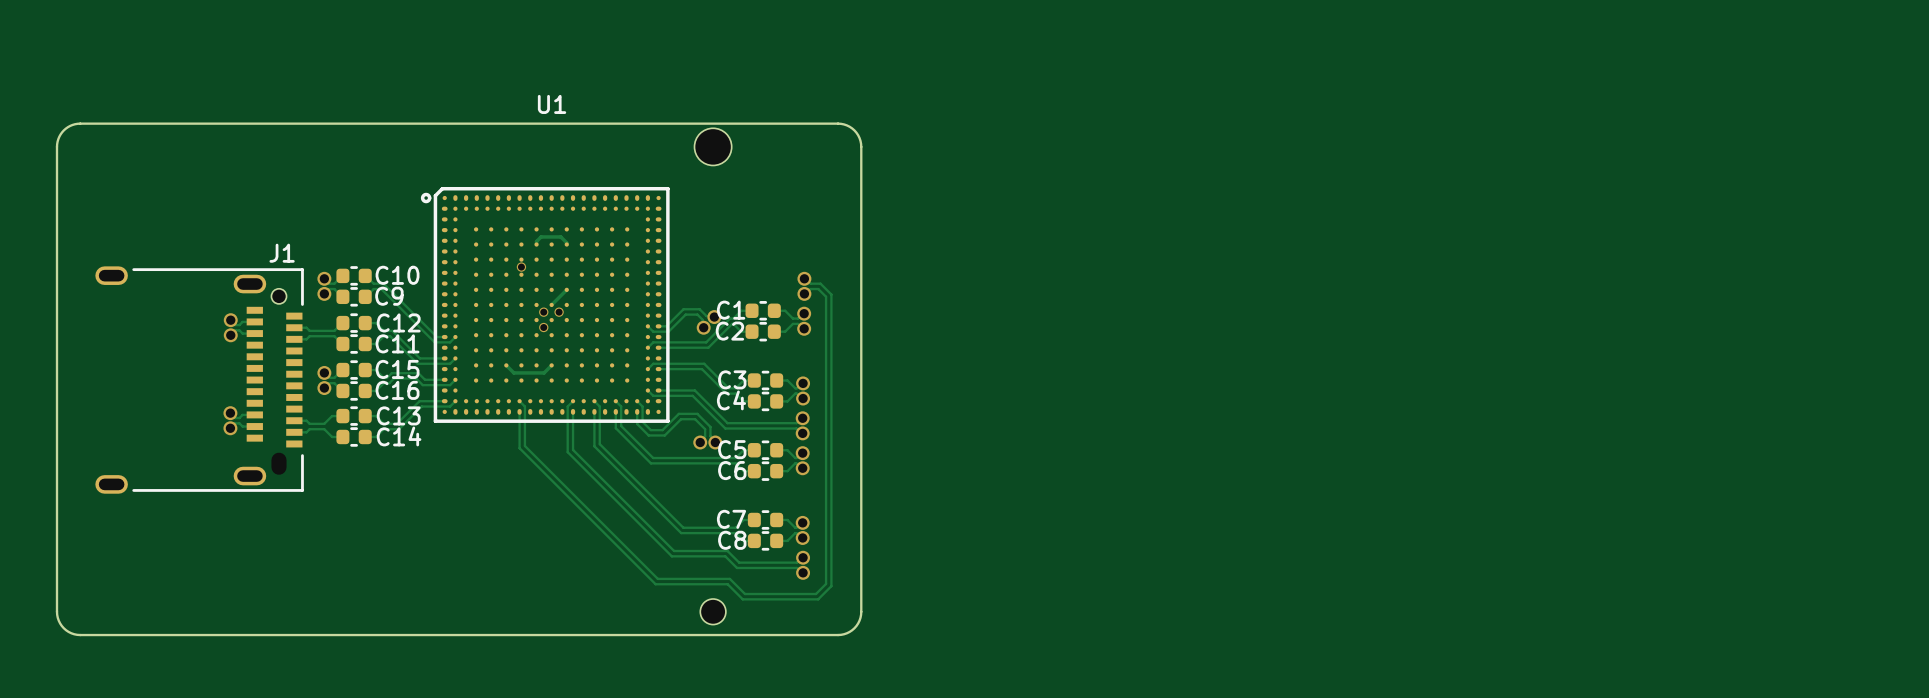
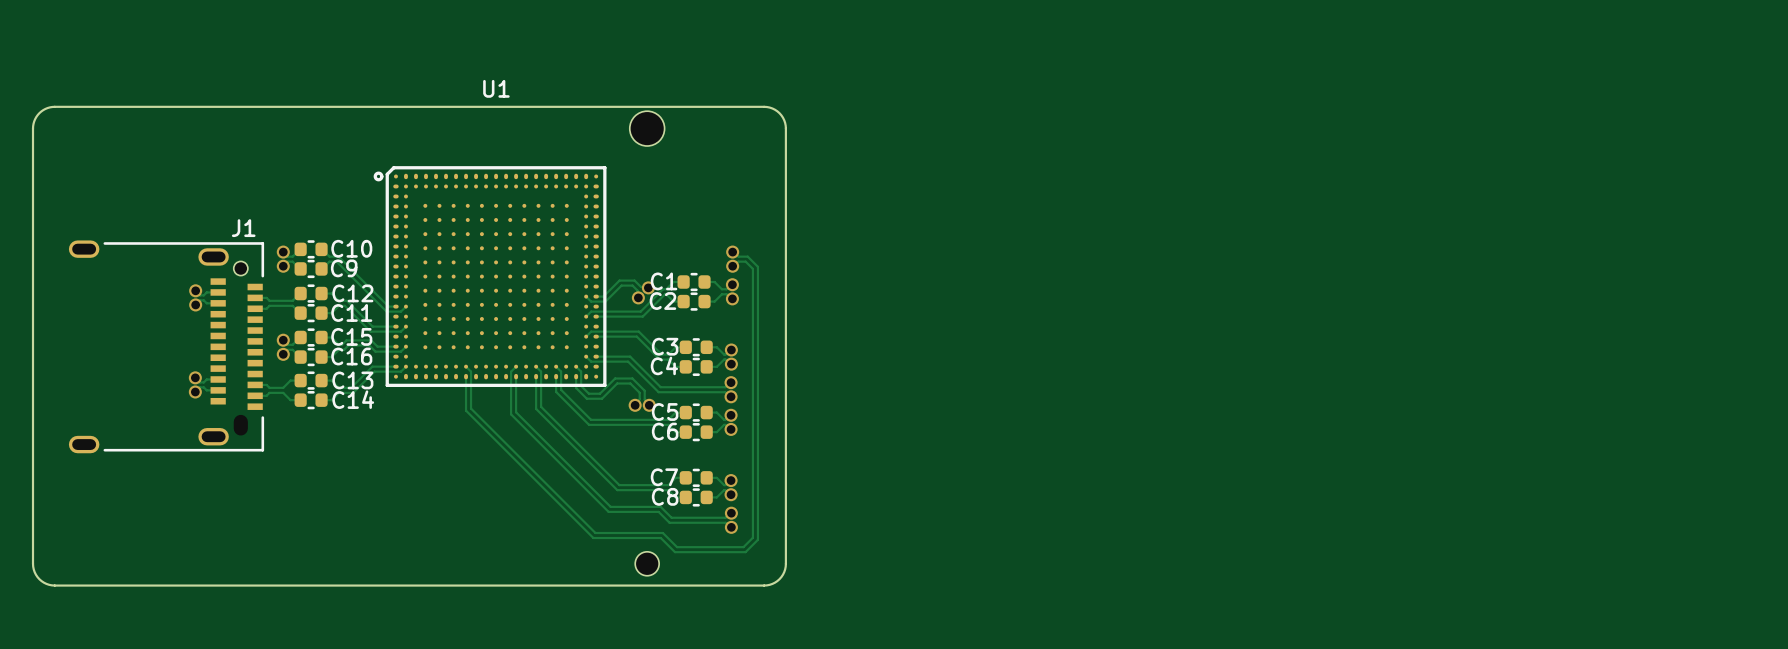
track: (536, 244) (536, 241) (541, 236) (560, 236) (566, 244) -> none
via: (521, 267) -> none
track: (566, 289) (551, 304) -> none
via: (543, 312) -> none
via: (559, 312) -> none
via: (543, 327) -> none
track: (506, 365) (513, 372) (544, 372) (551, 365) -> none

